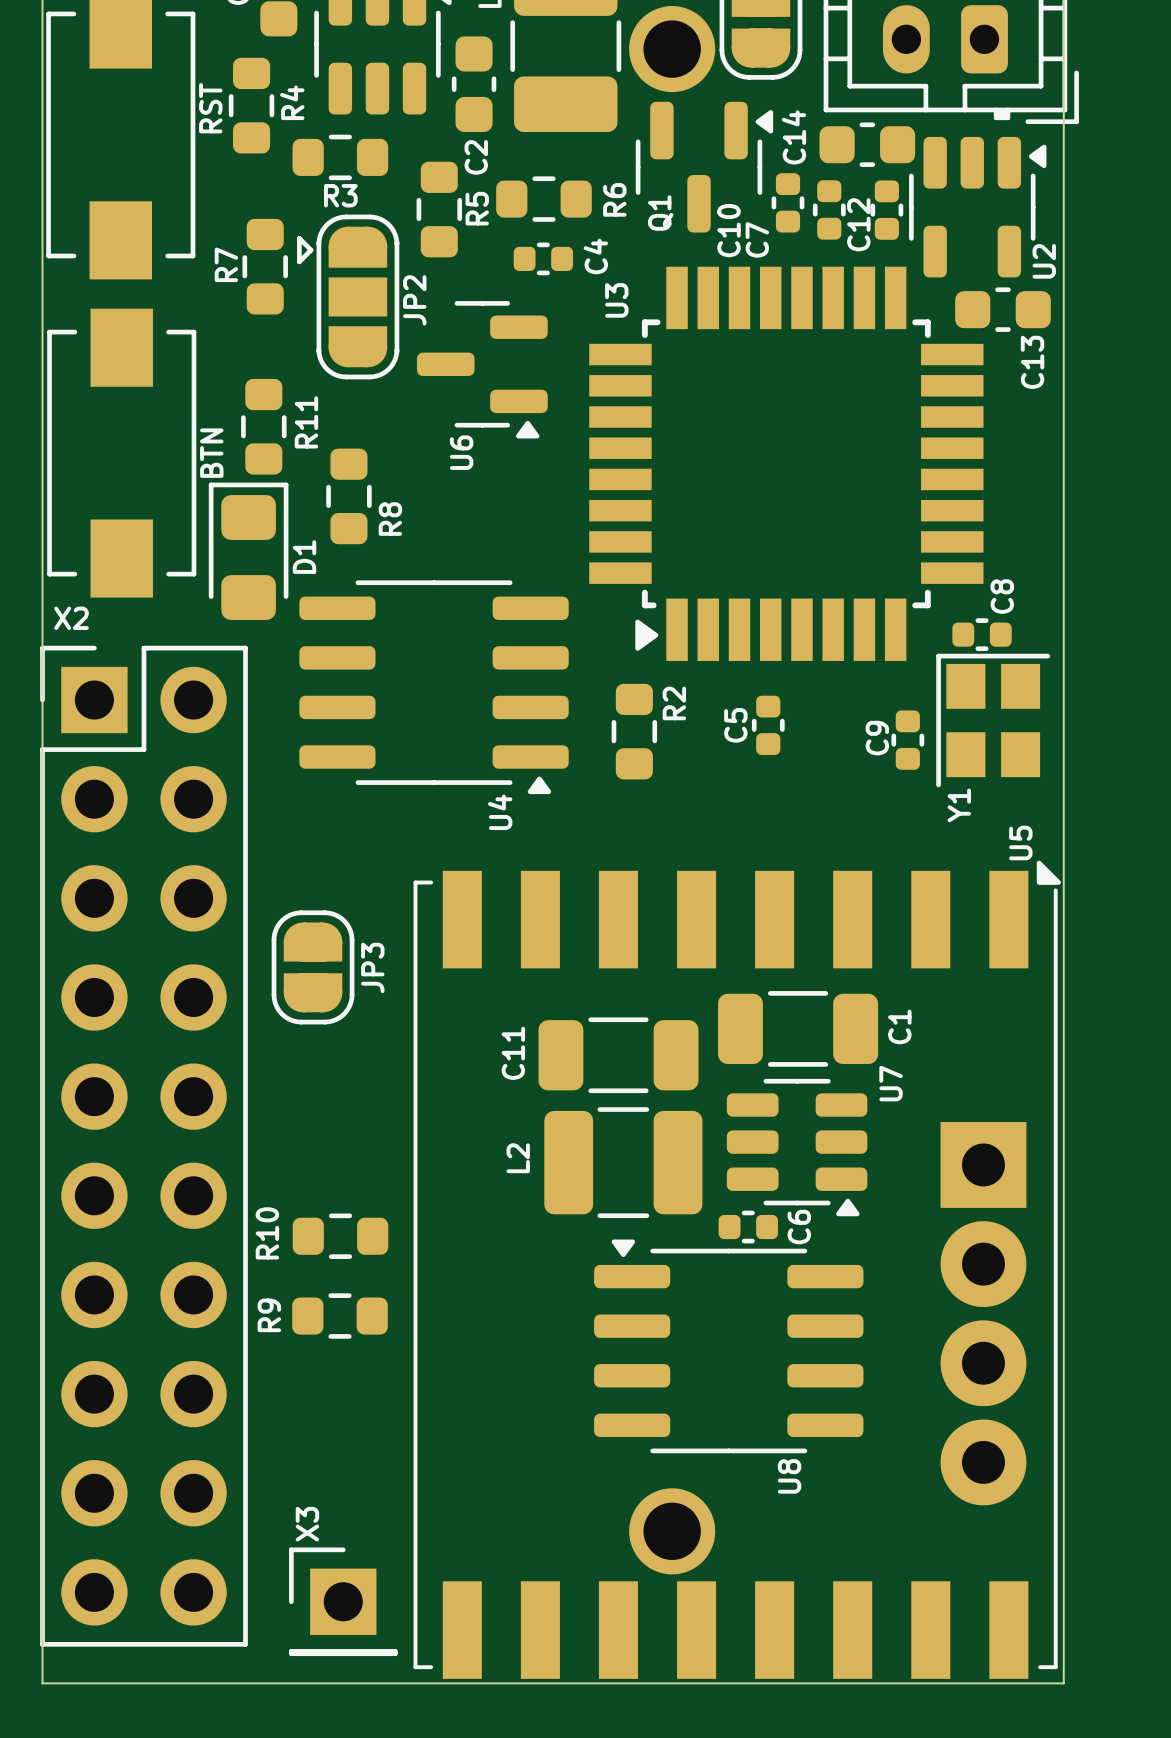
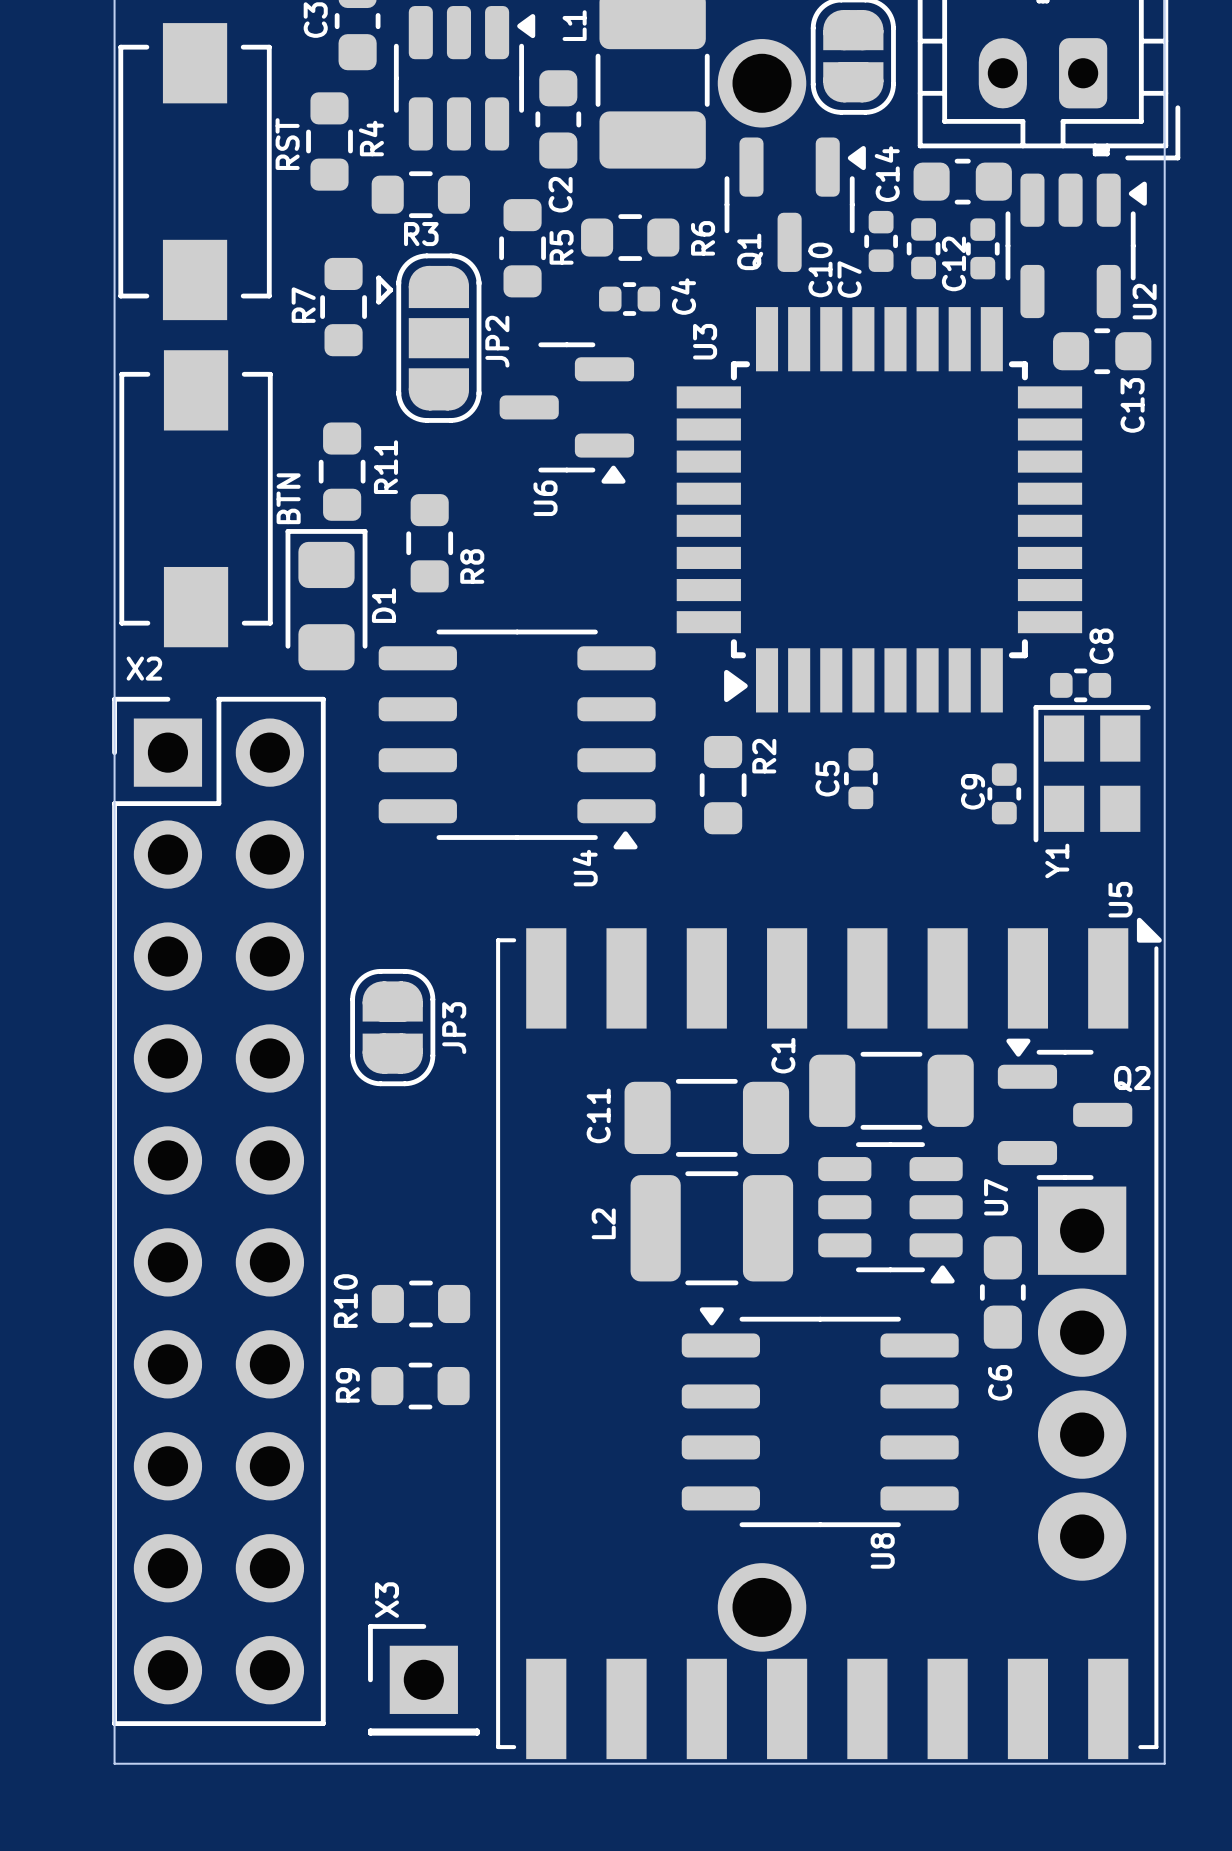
C1 name position: C1 (899, 1026) -> C1 (783, 1055)
Q2: none -> (1065, 1109)
U7 name position: U7 (891, 1083) -> U7 (996, 1197)
C6 footprint: [718, 1210, 778, 1244] -> [979, 1236, 1026, 1349]
C6 name position: C6 (799, 1227) -> C6 (1000, 1382)

